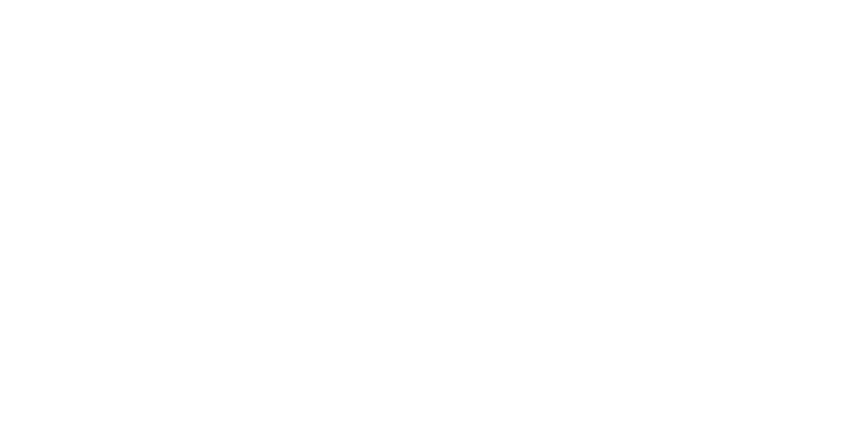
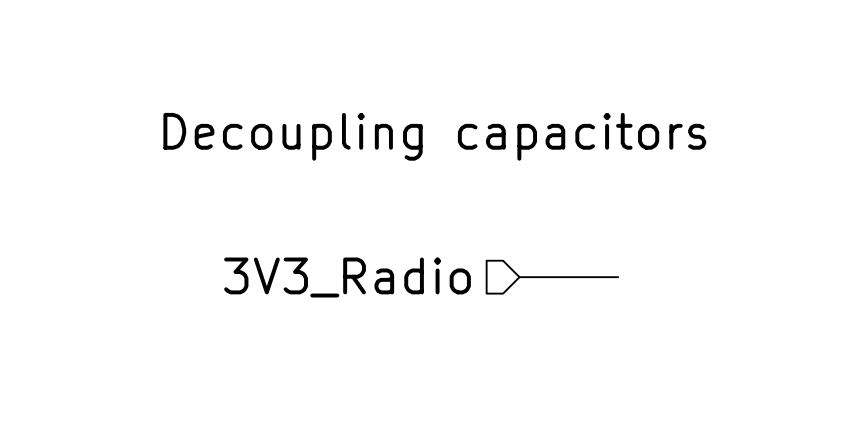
text: none -> Decoupling capacitors (434, 136)
hierarchical label: none -> 3V3_Radio (347, 277)
wire: none -> (519, 277) (618, 277)

